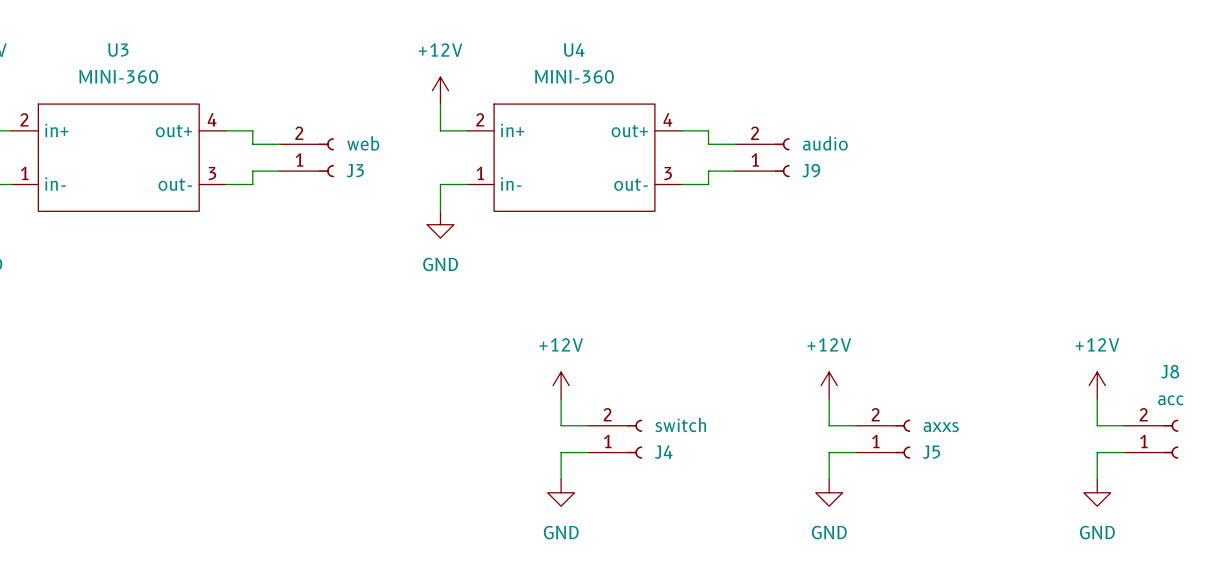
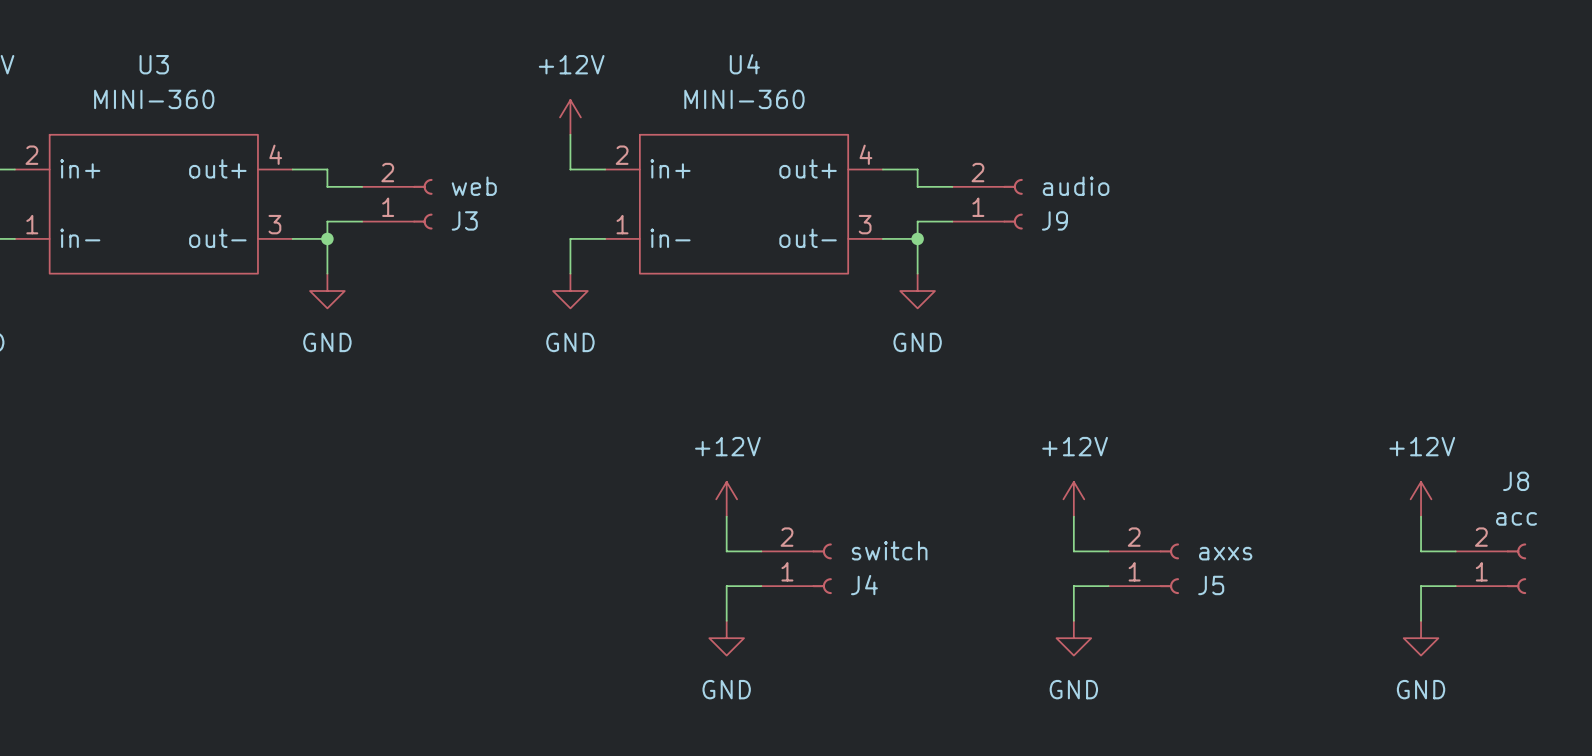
wire: none -> (327, 238) (327, 273)
junction: none -> (327, 238)
wire: none -> (917, 238) (917, 273)
junction: none -> (917, 238)
power symbol: none -> GND (327, 291)
power symbol: none -> GND (917, 291)

